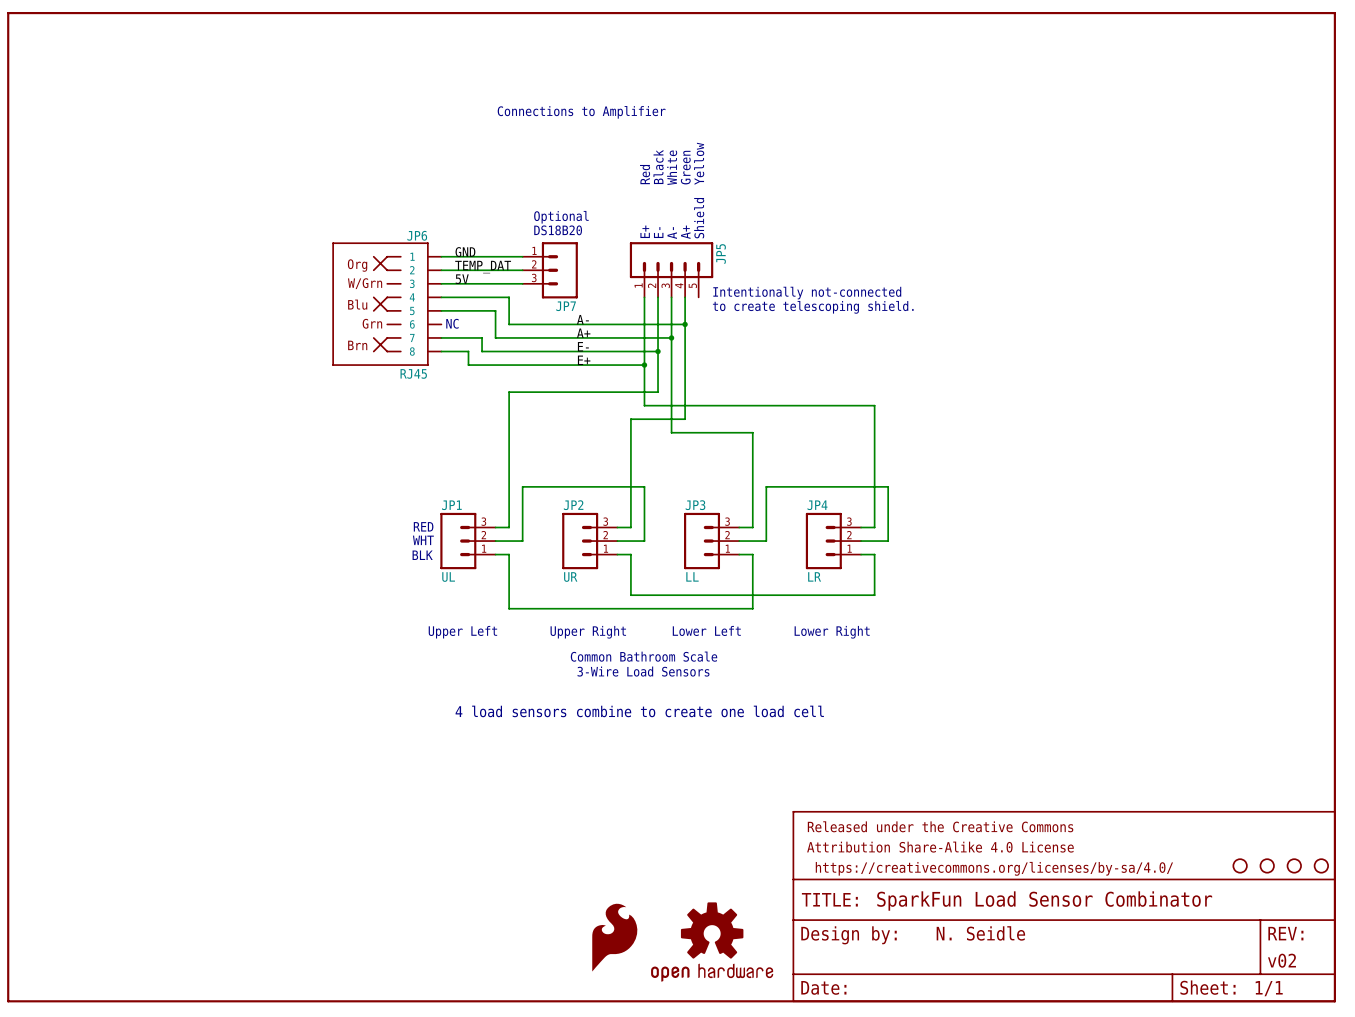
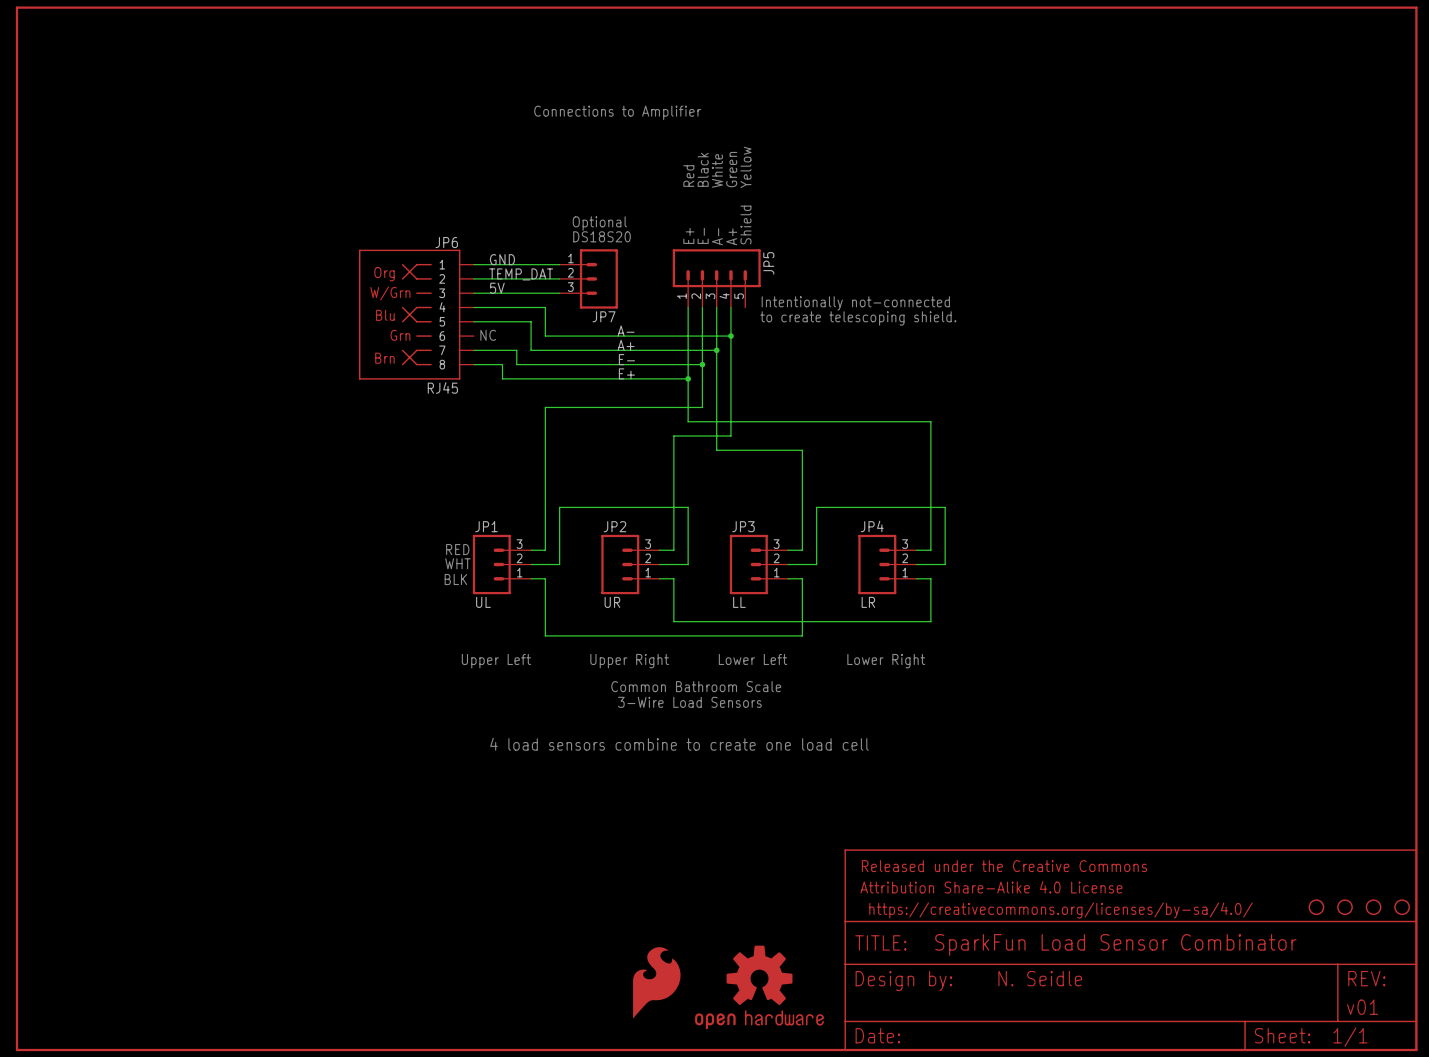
text: DS18B20 (558, 230) -> DS18S20 (601, 236)
part text: v02 (1281, 960) -> v01 (1362, 1007)

